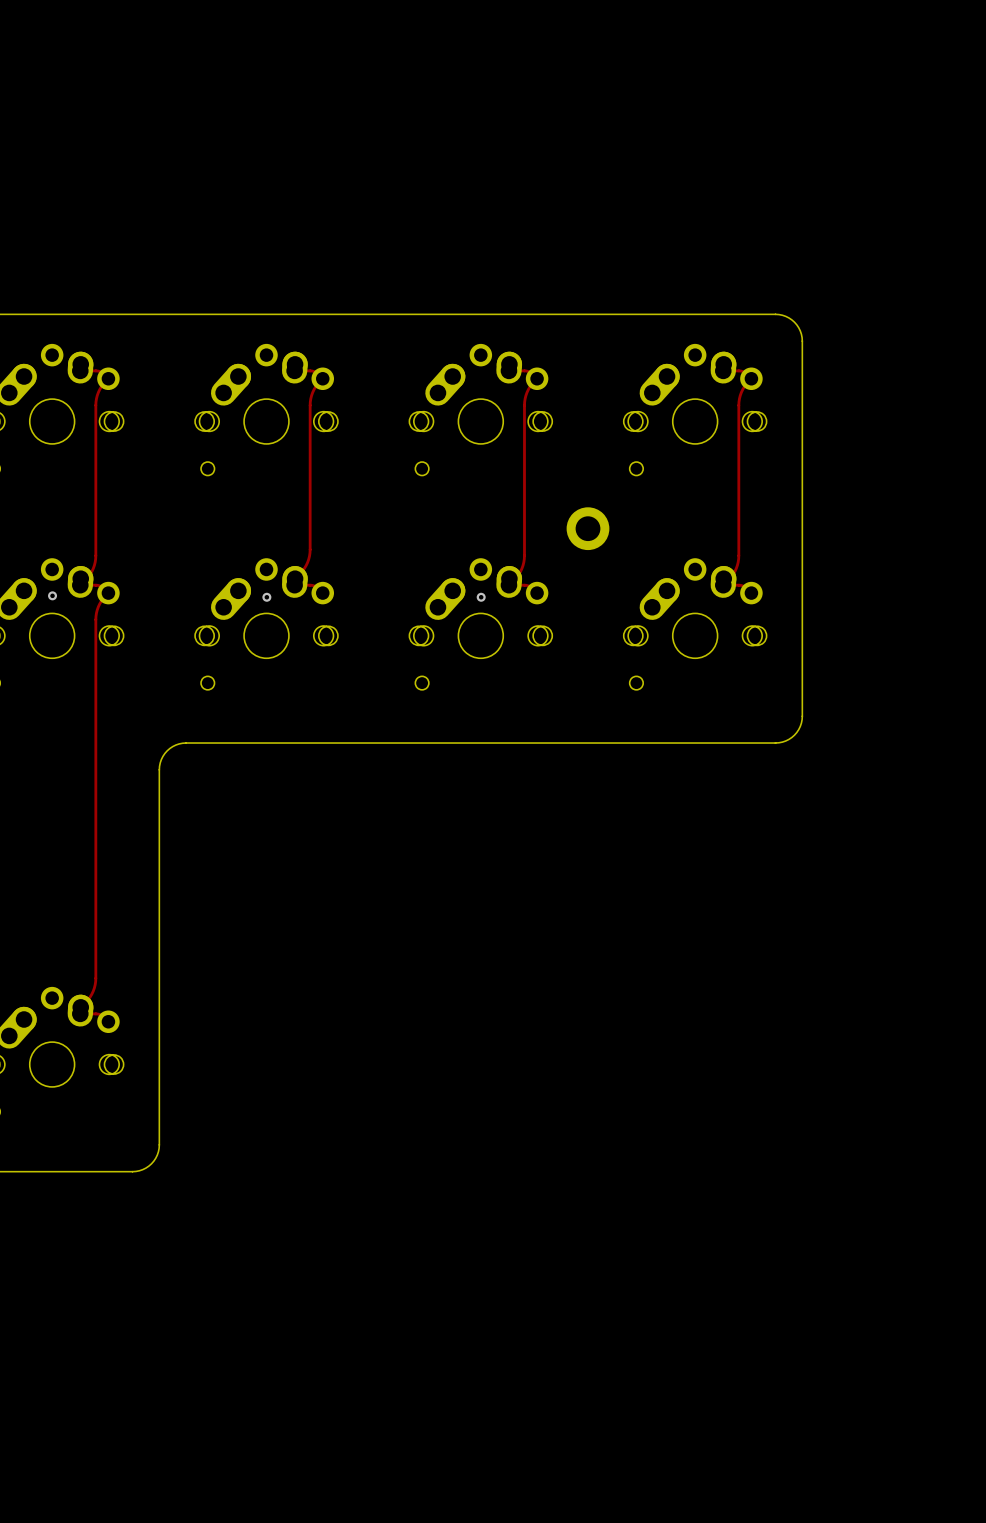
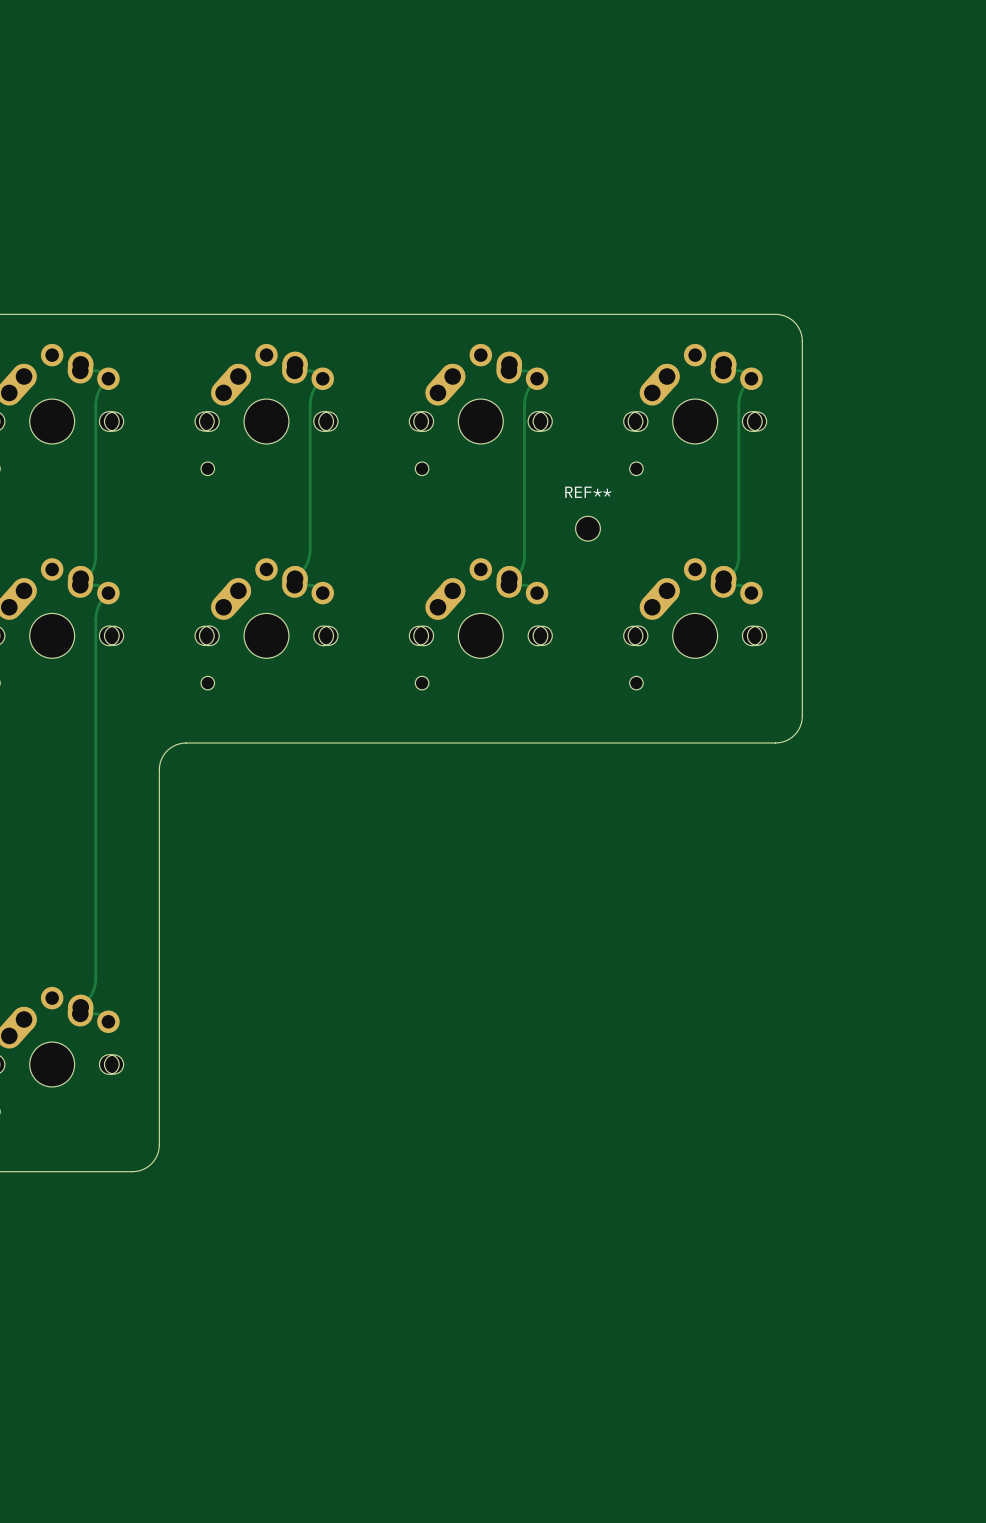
part: (588, 528) -> none
REF**: none -> (588, 528)
via: (52, 595) -> none
via: (266, 597) -> none
via: (481, 597) -> none

